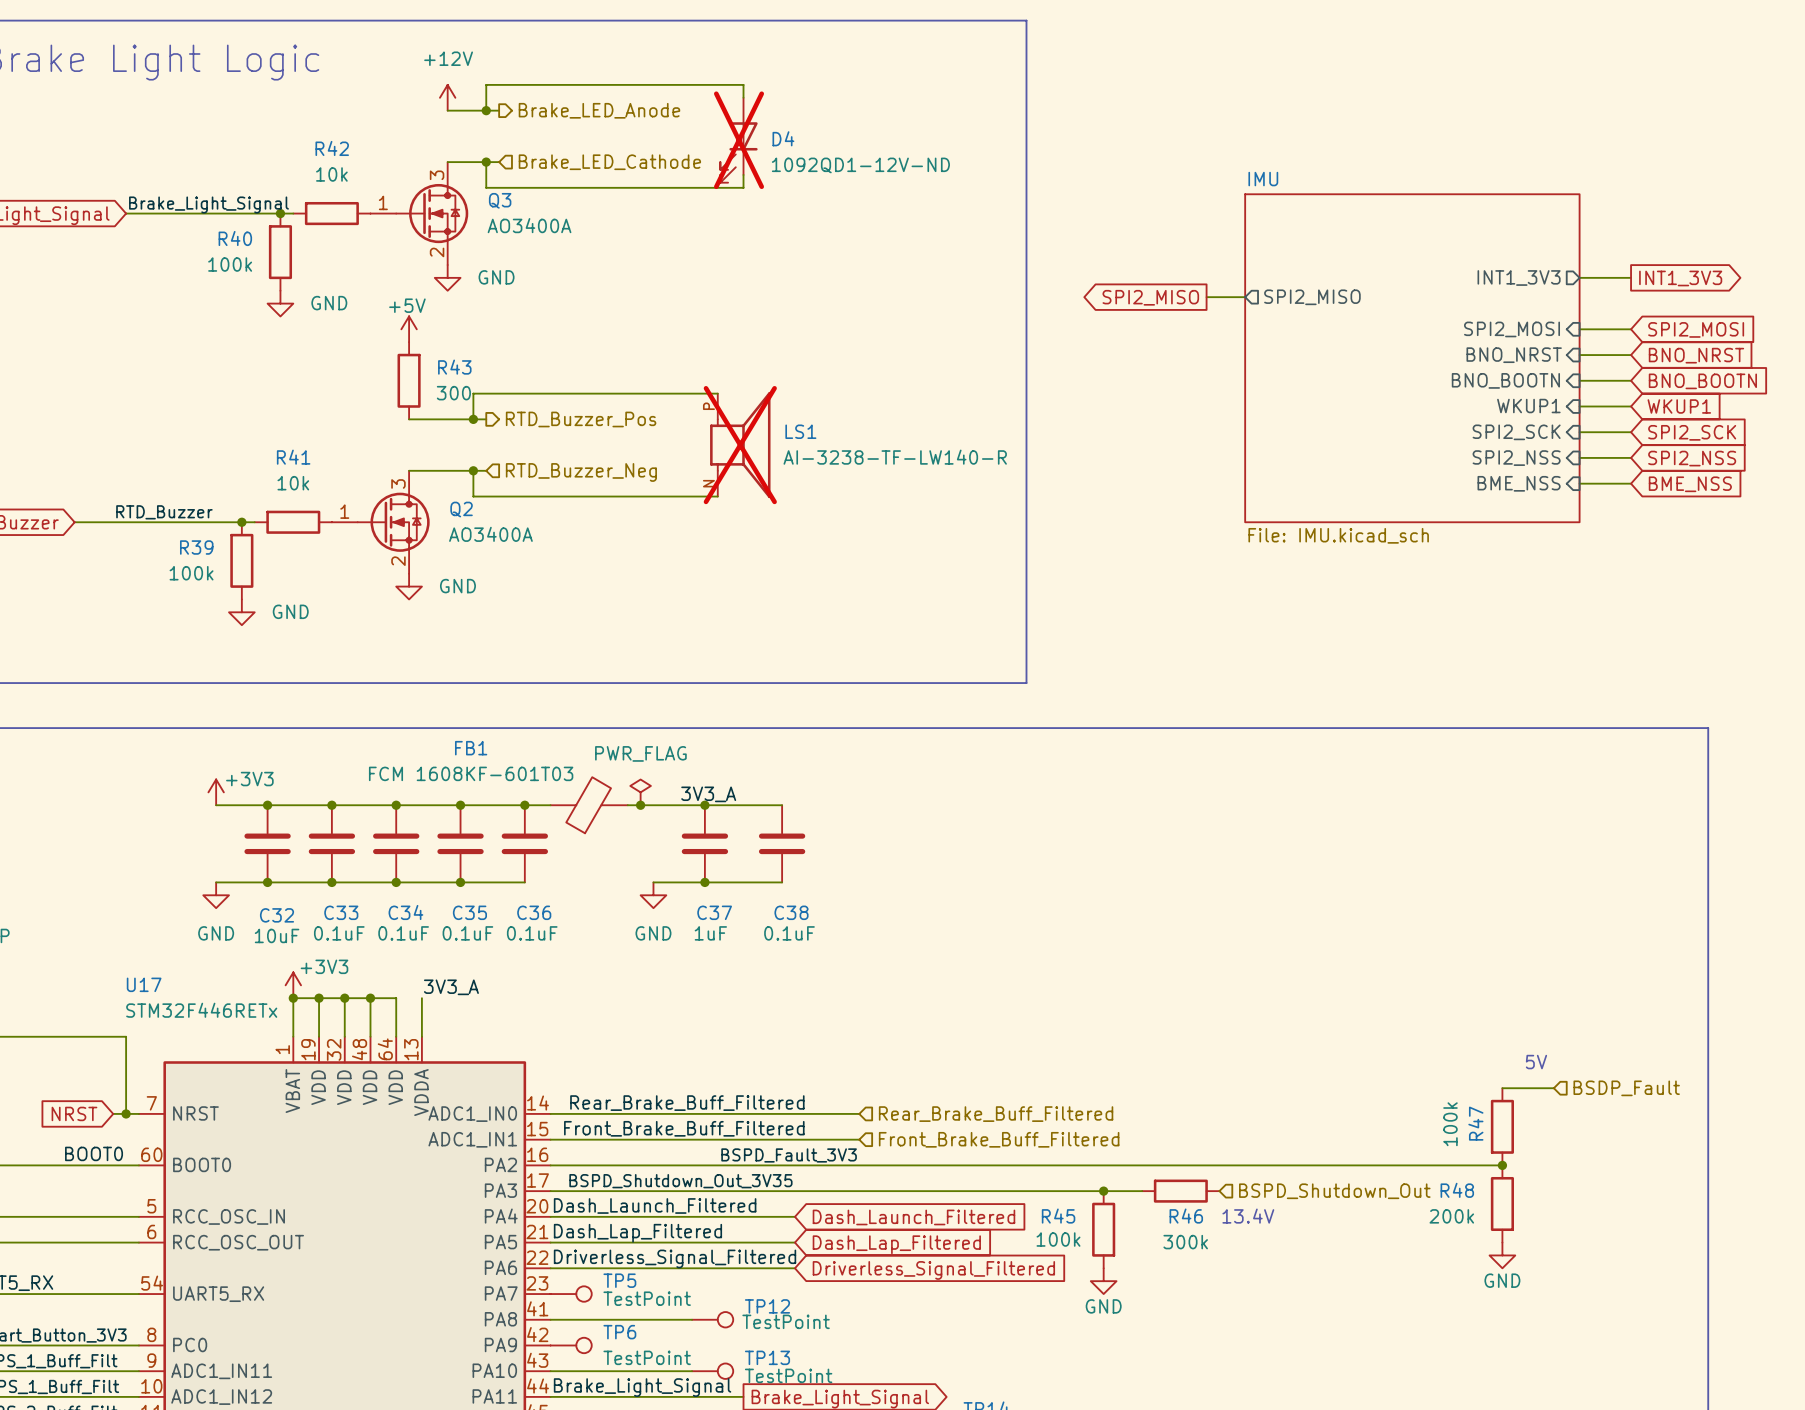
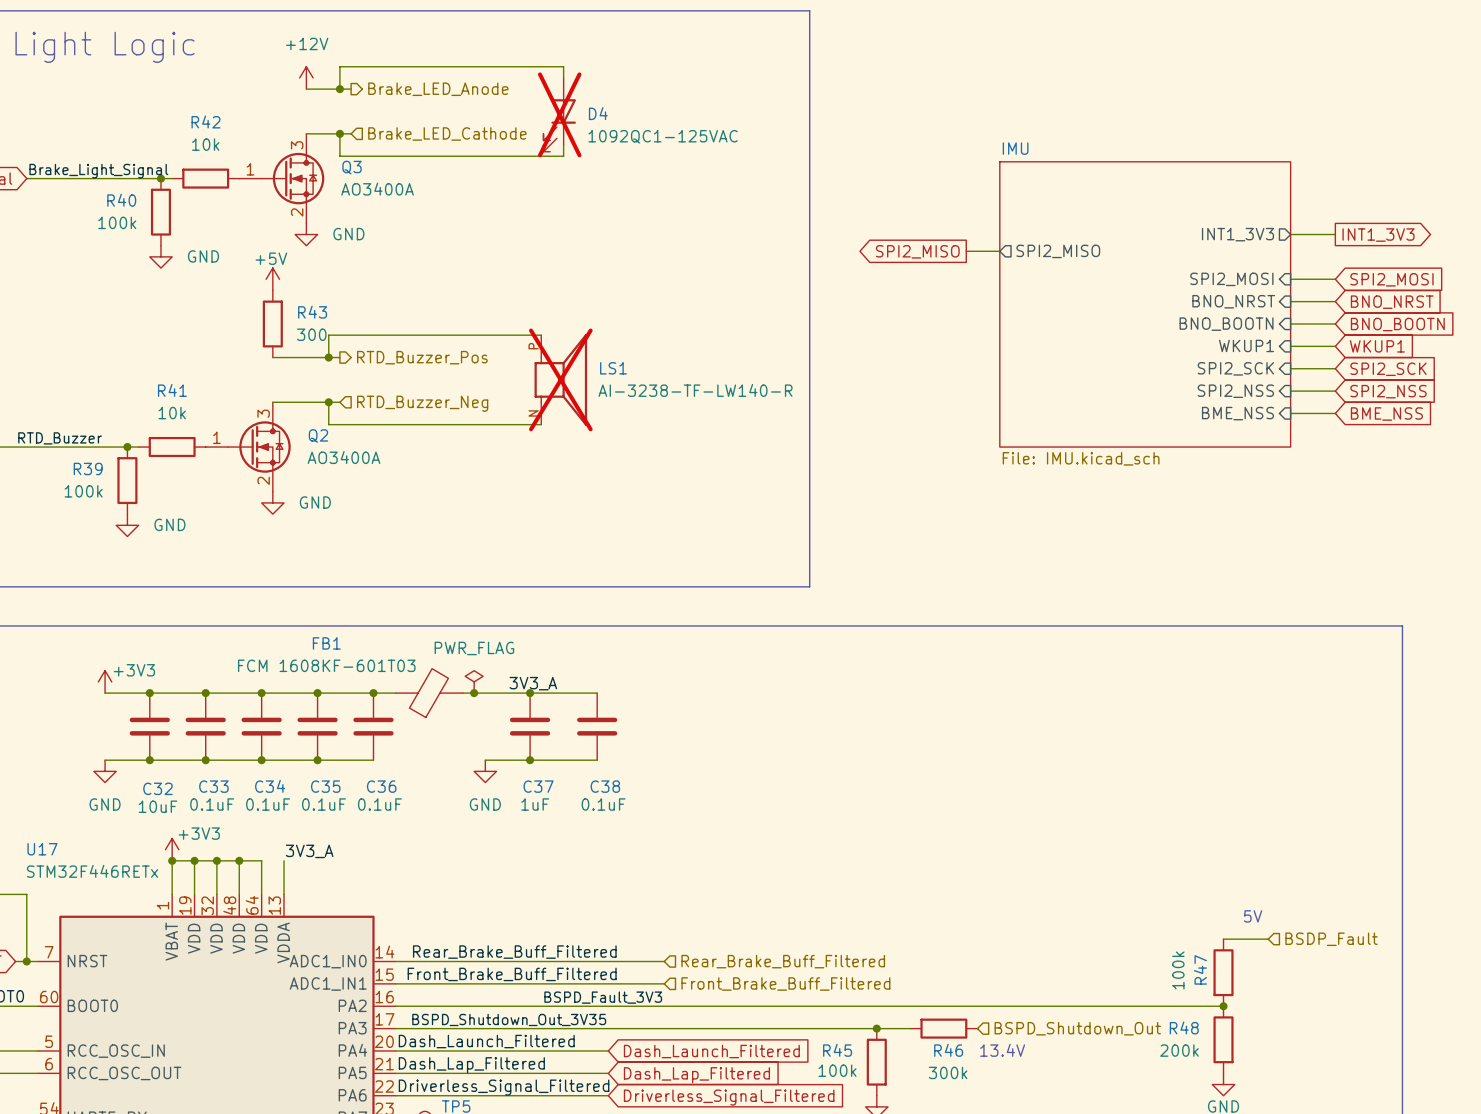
D4 value: 1092QD1-12V-ND (860, 165) -> 1092QC1-125VAC (663, 136)

